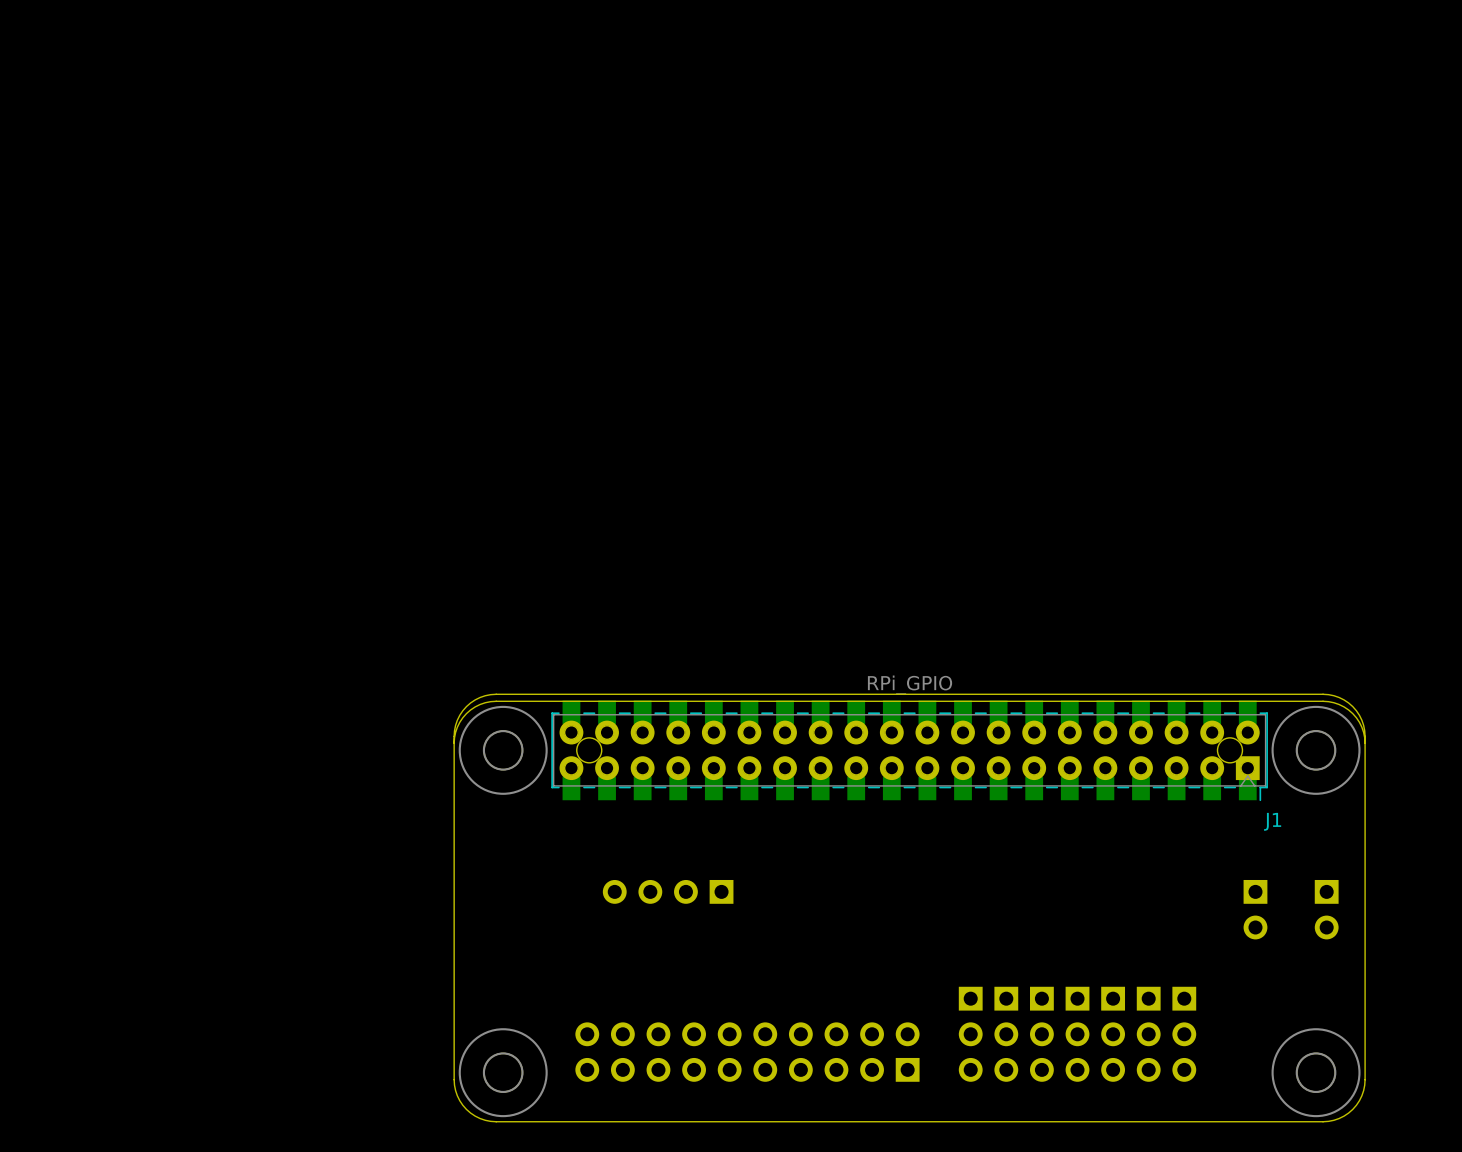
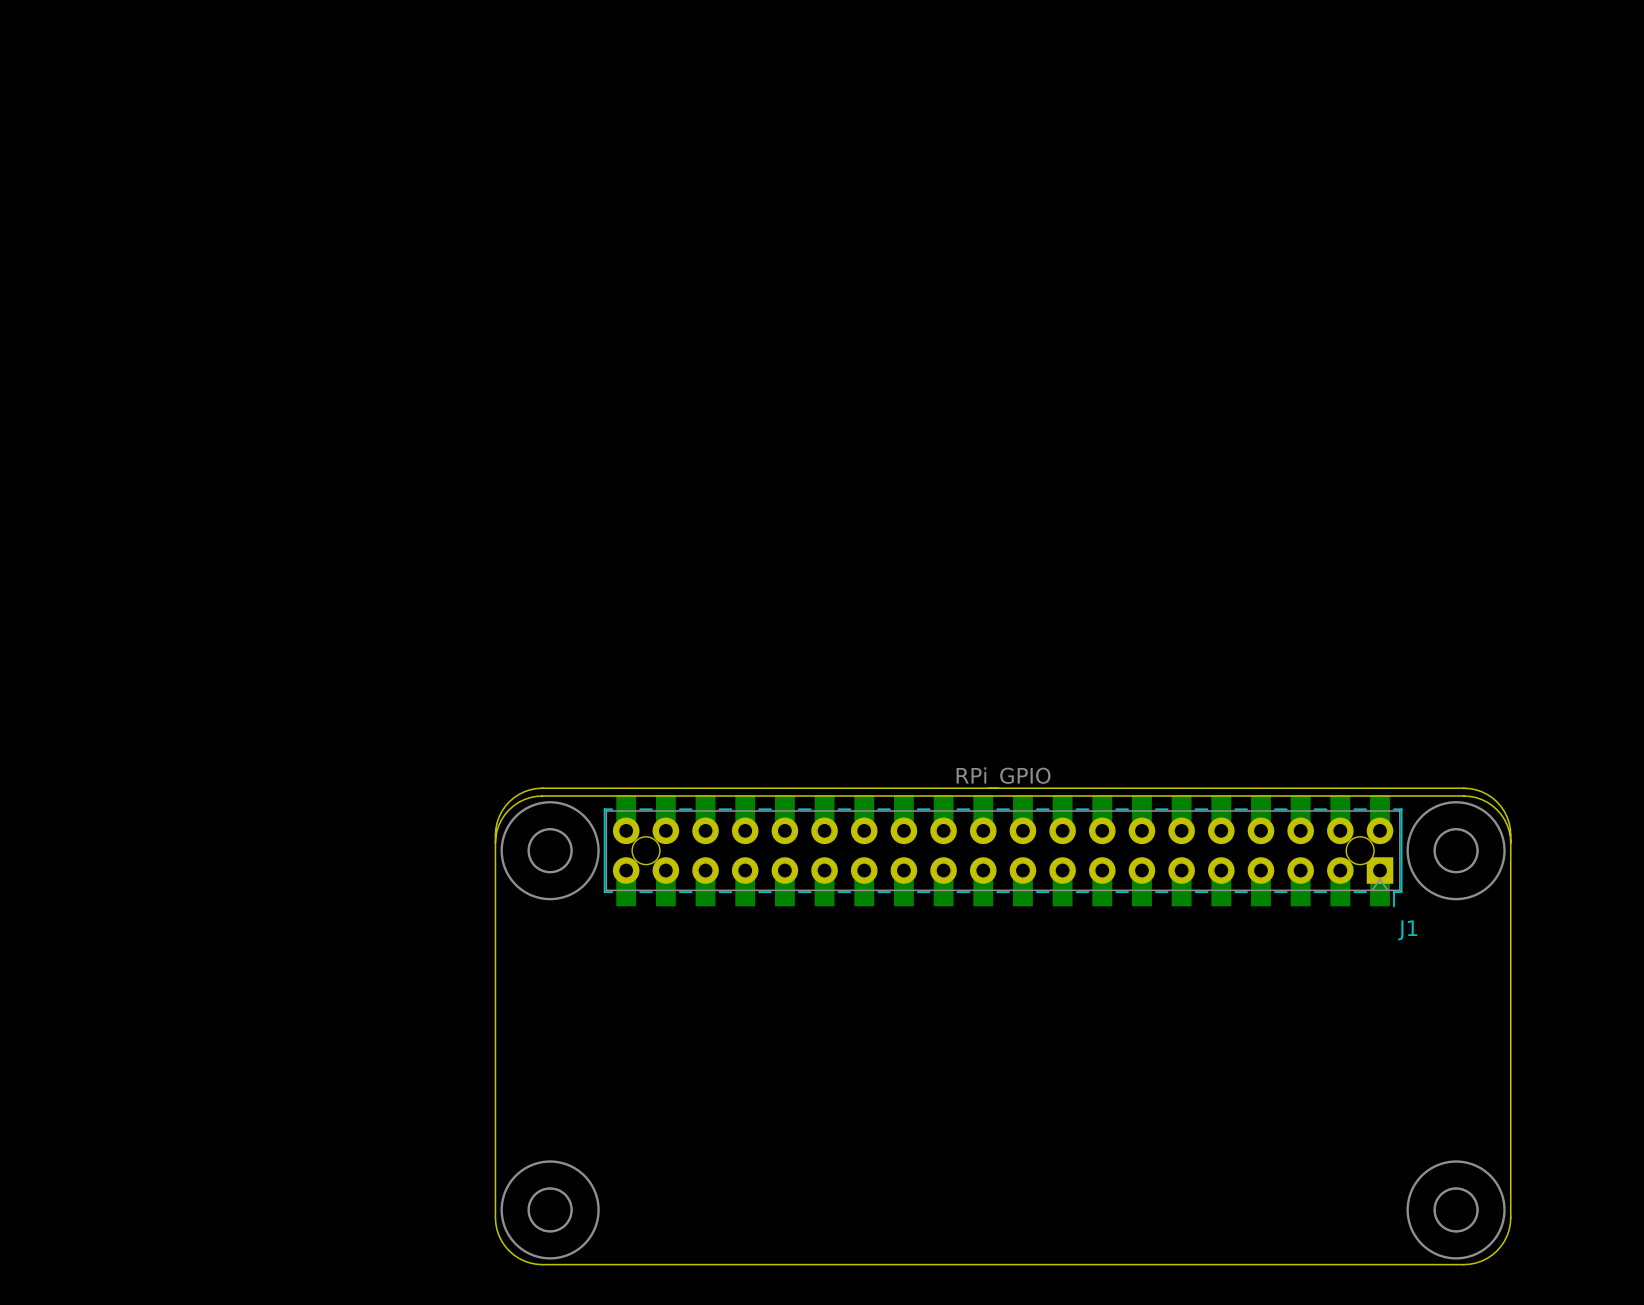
part: (668, 891) -> none
part: (1255, 909) -> none
part: (1326, 909) -> none
part: (970, 1034) -> none
part: (1006, 1034) -> none
part: (1041, 1034) -> none
part: (1077, 1034) -> none
part: (1113, 1034) -> none
part: (1148, 1034) -> none
part: (1184, 1034) -> none
part: (747, 1052) -> none

